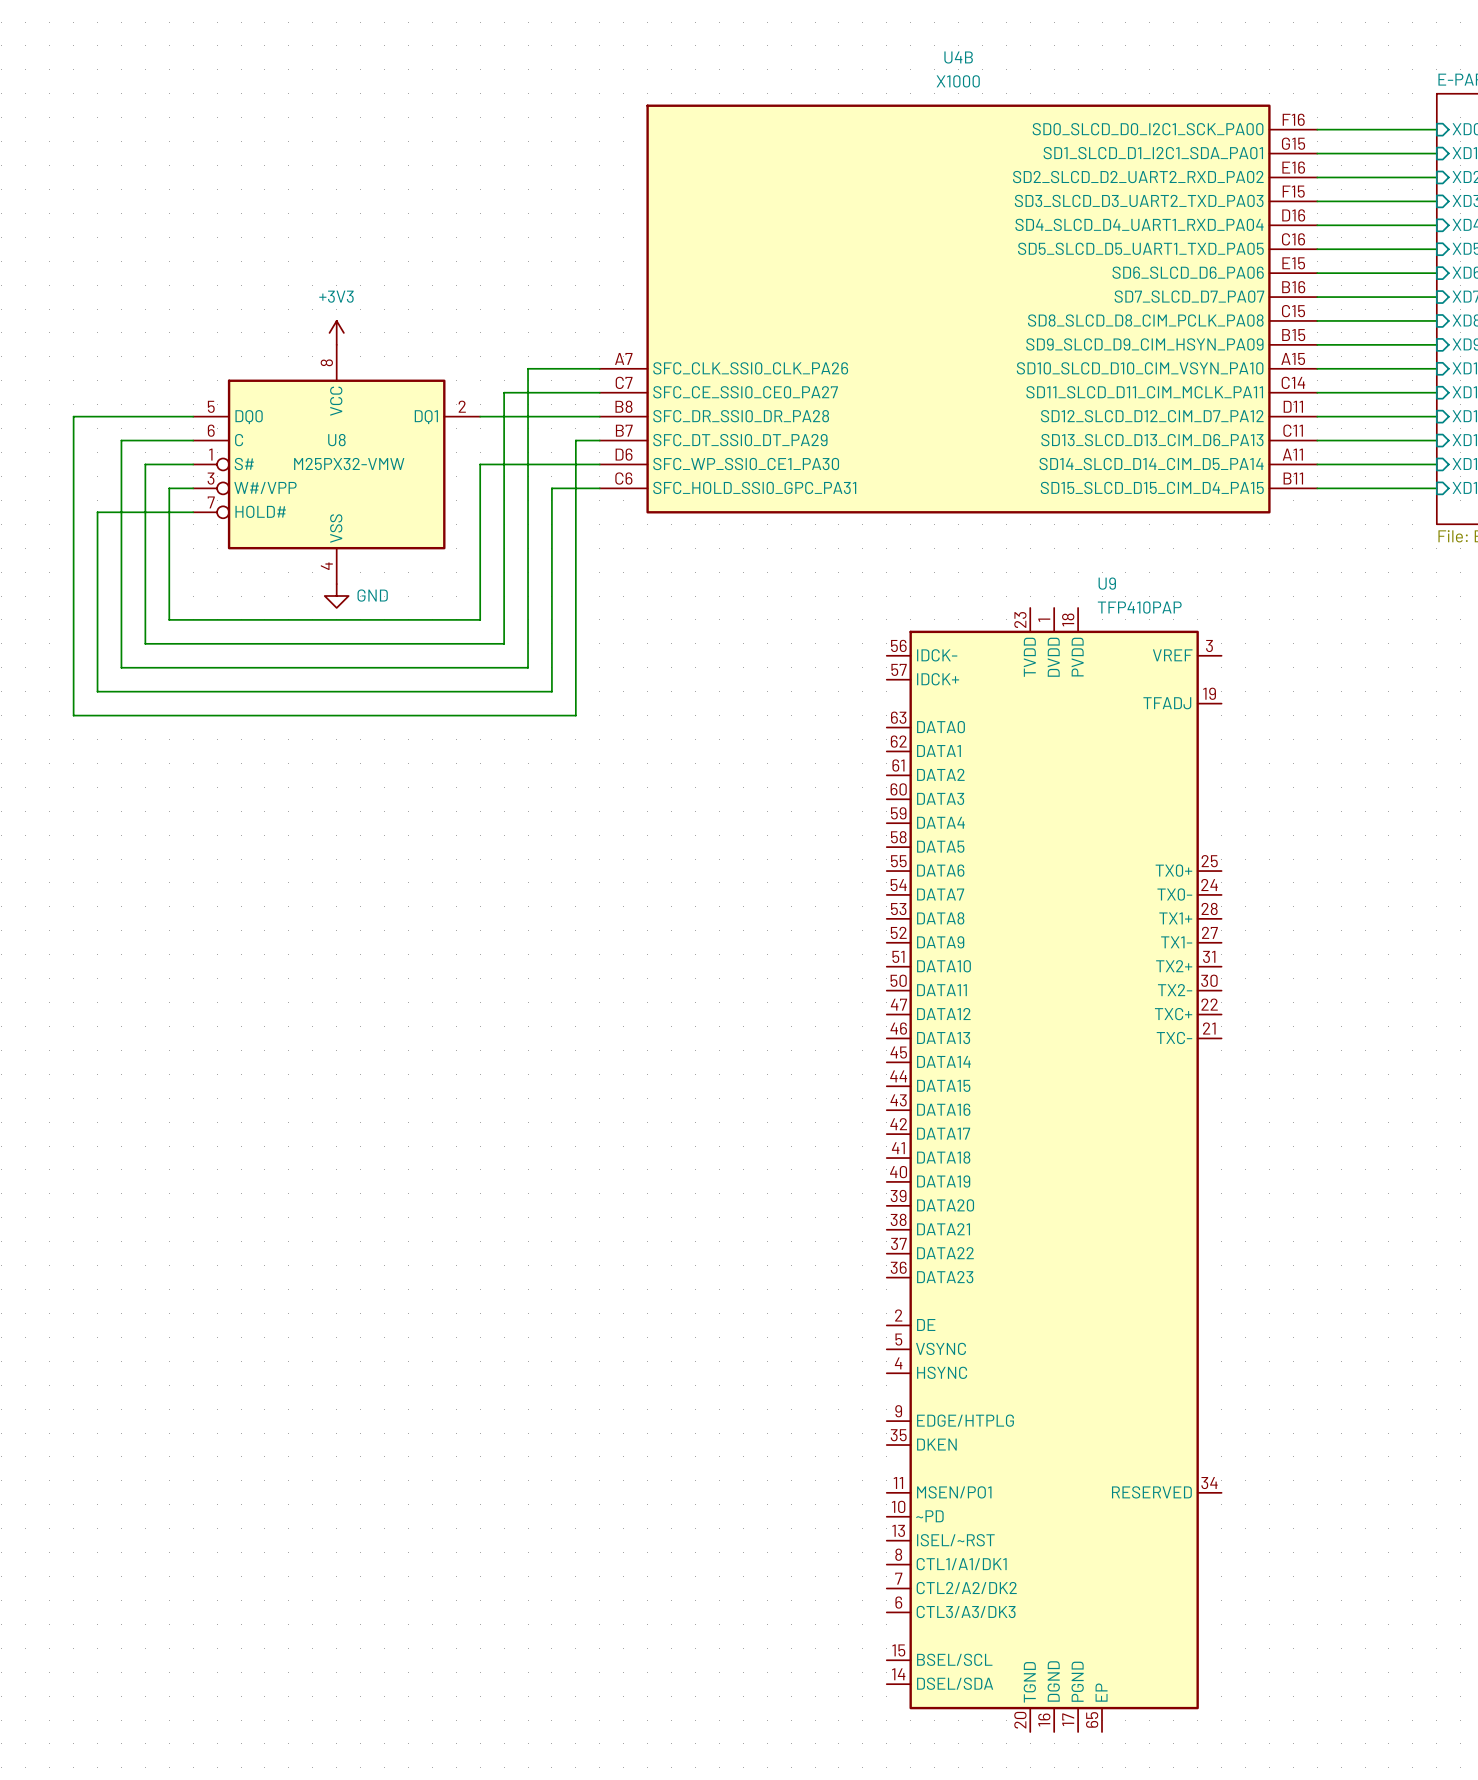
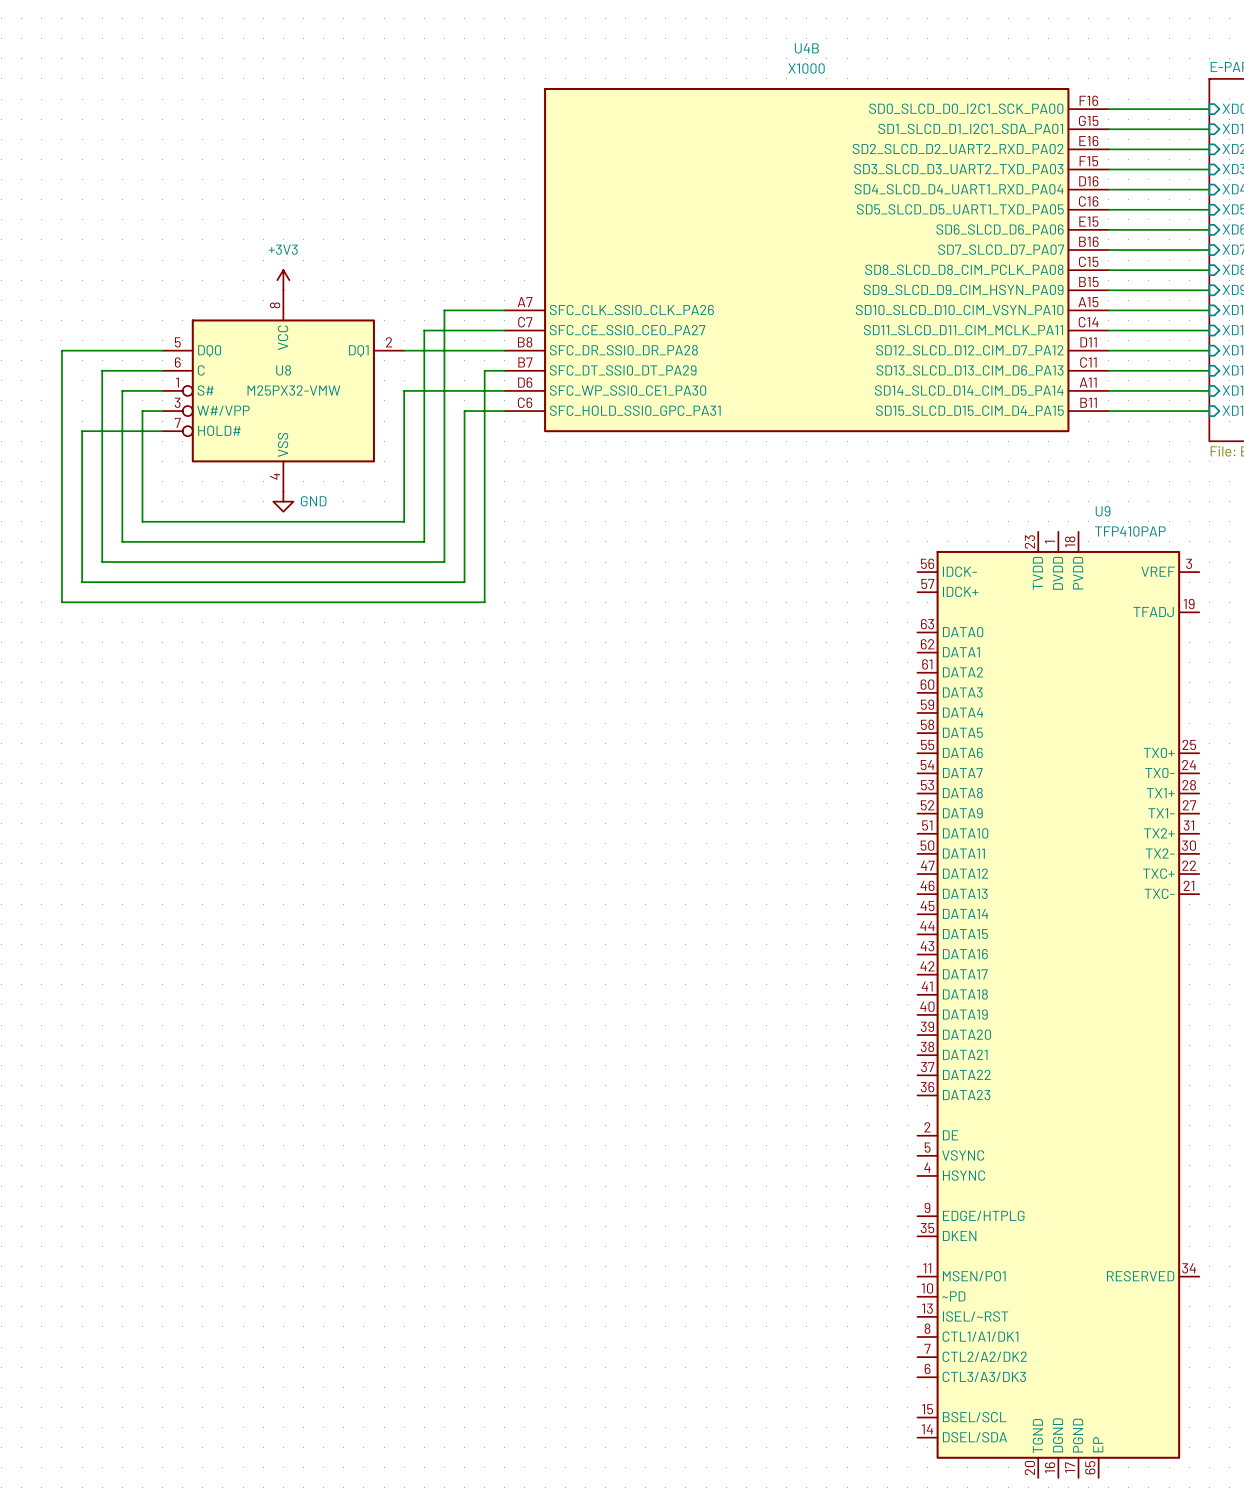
U9 position: (1054, 1169) -> (1058, 1004)

